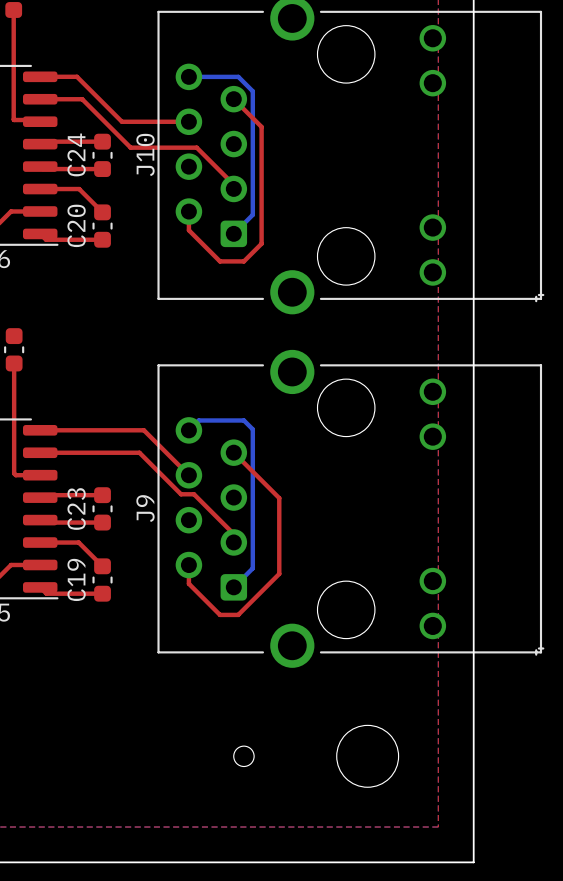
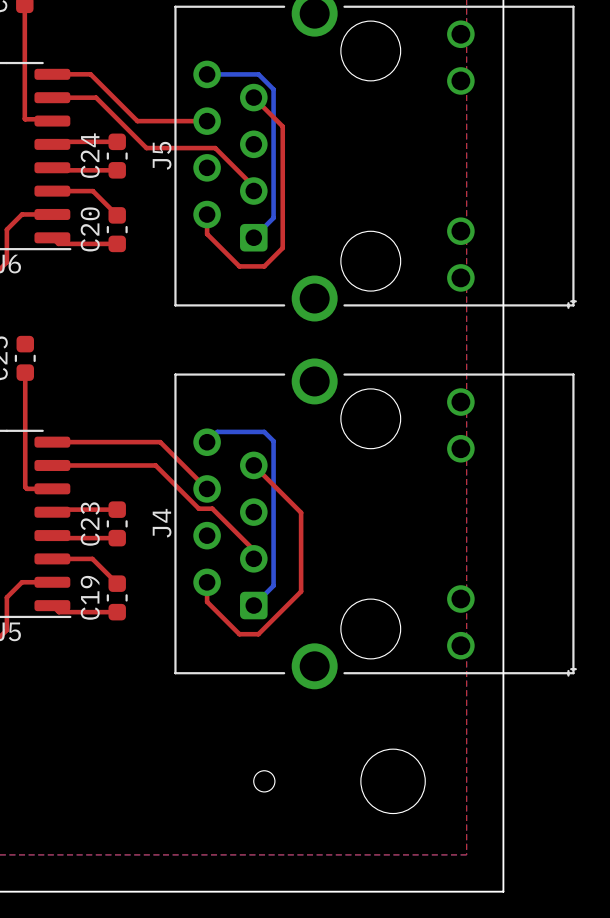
J10 name: J10 (145, 154) -> J5 (162, 155)
J9 name: J9 (145, 508) -> J4 (162, 523)

